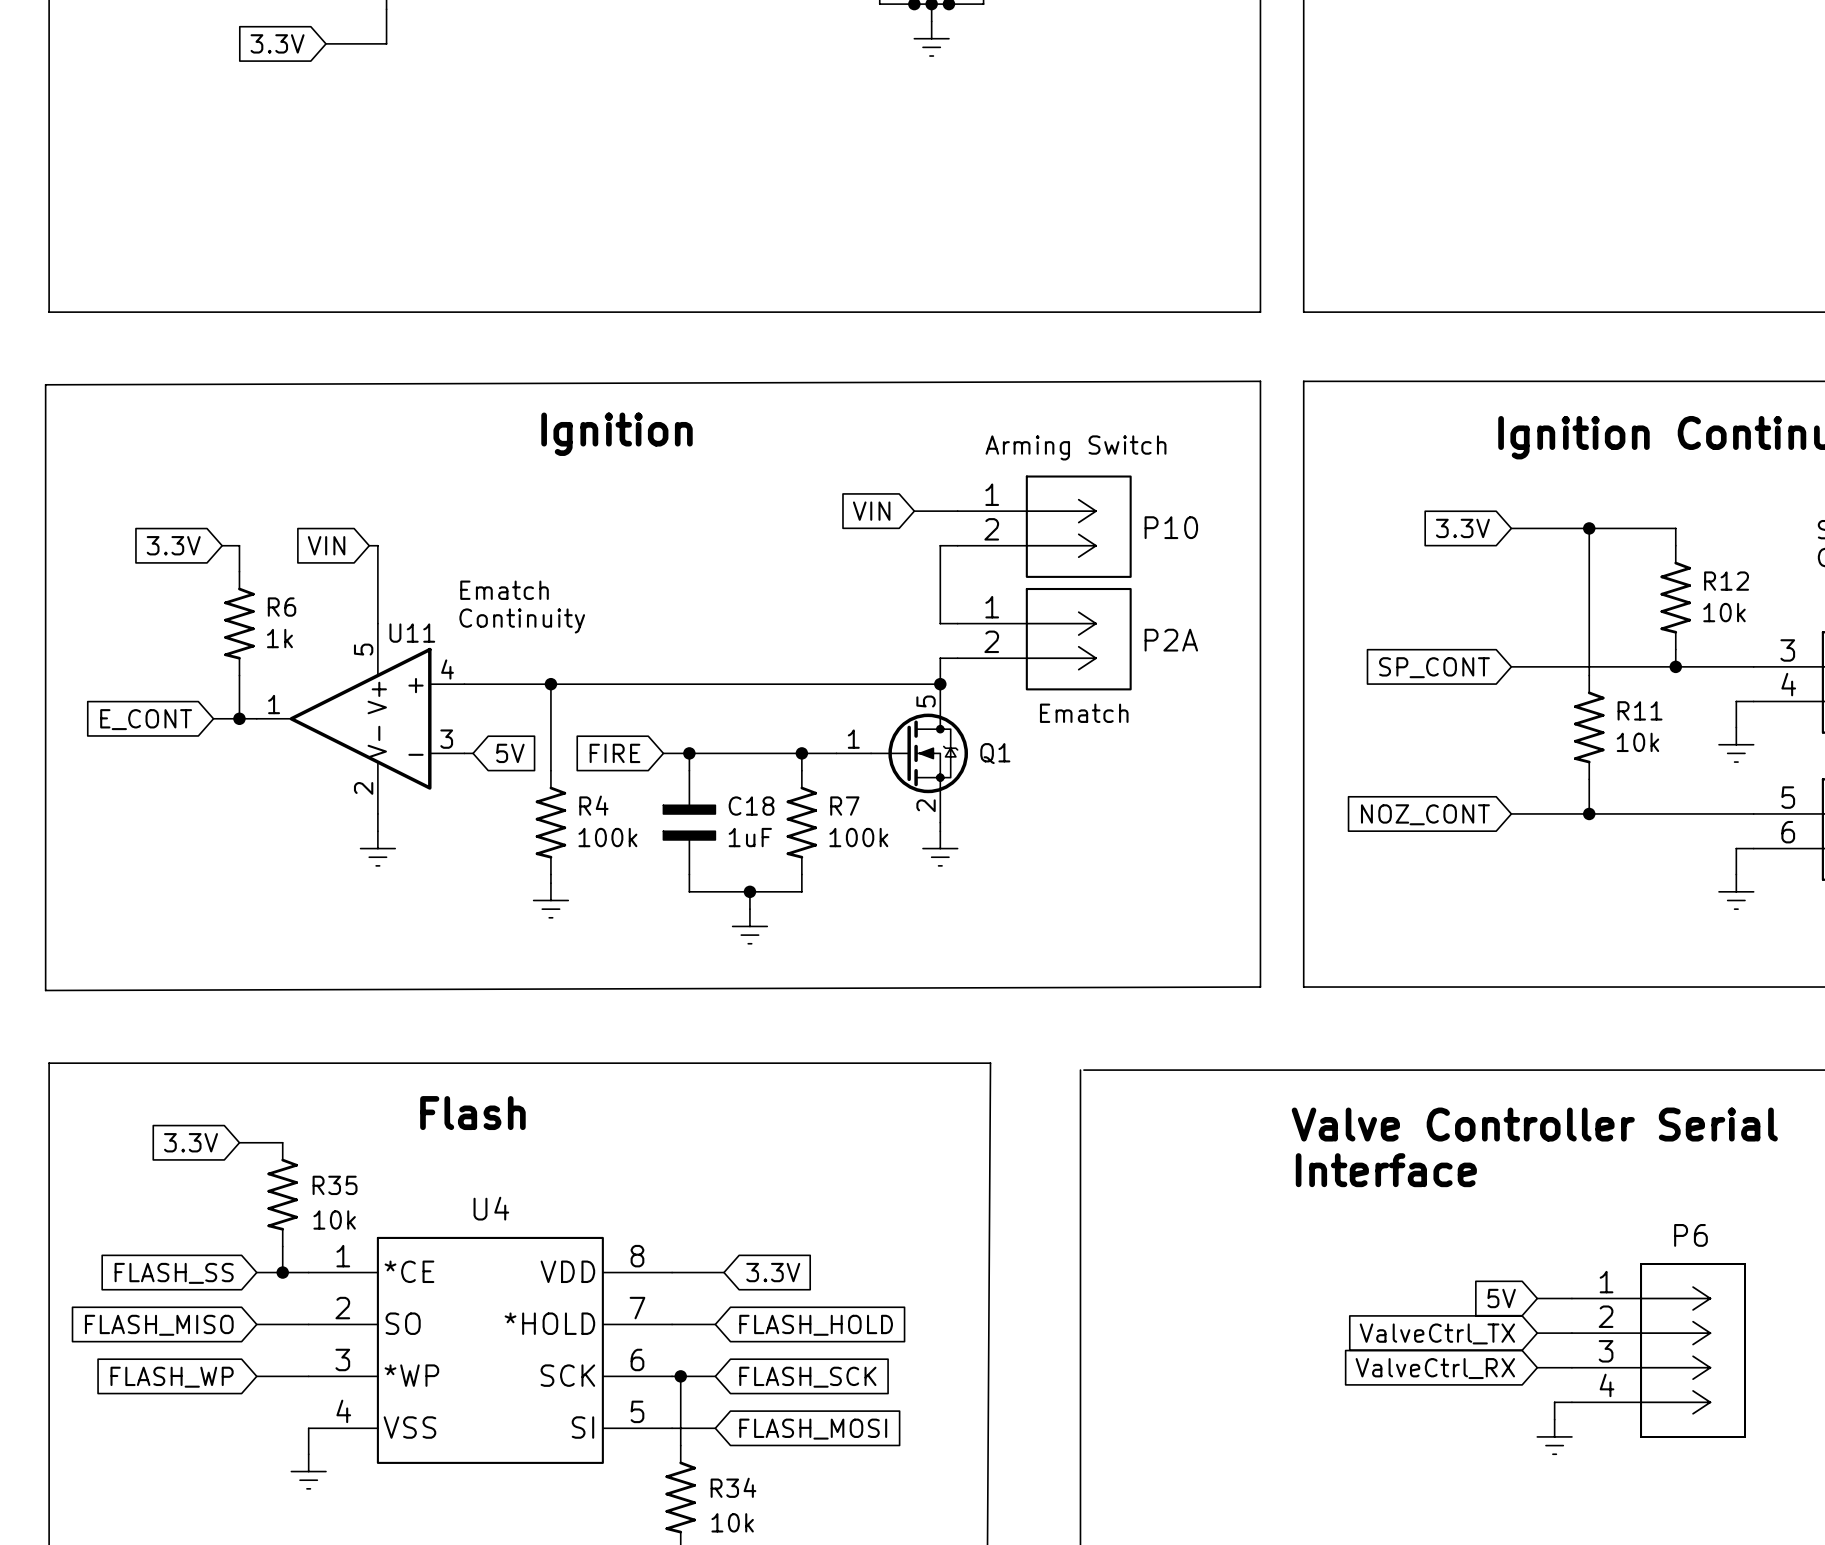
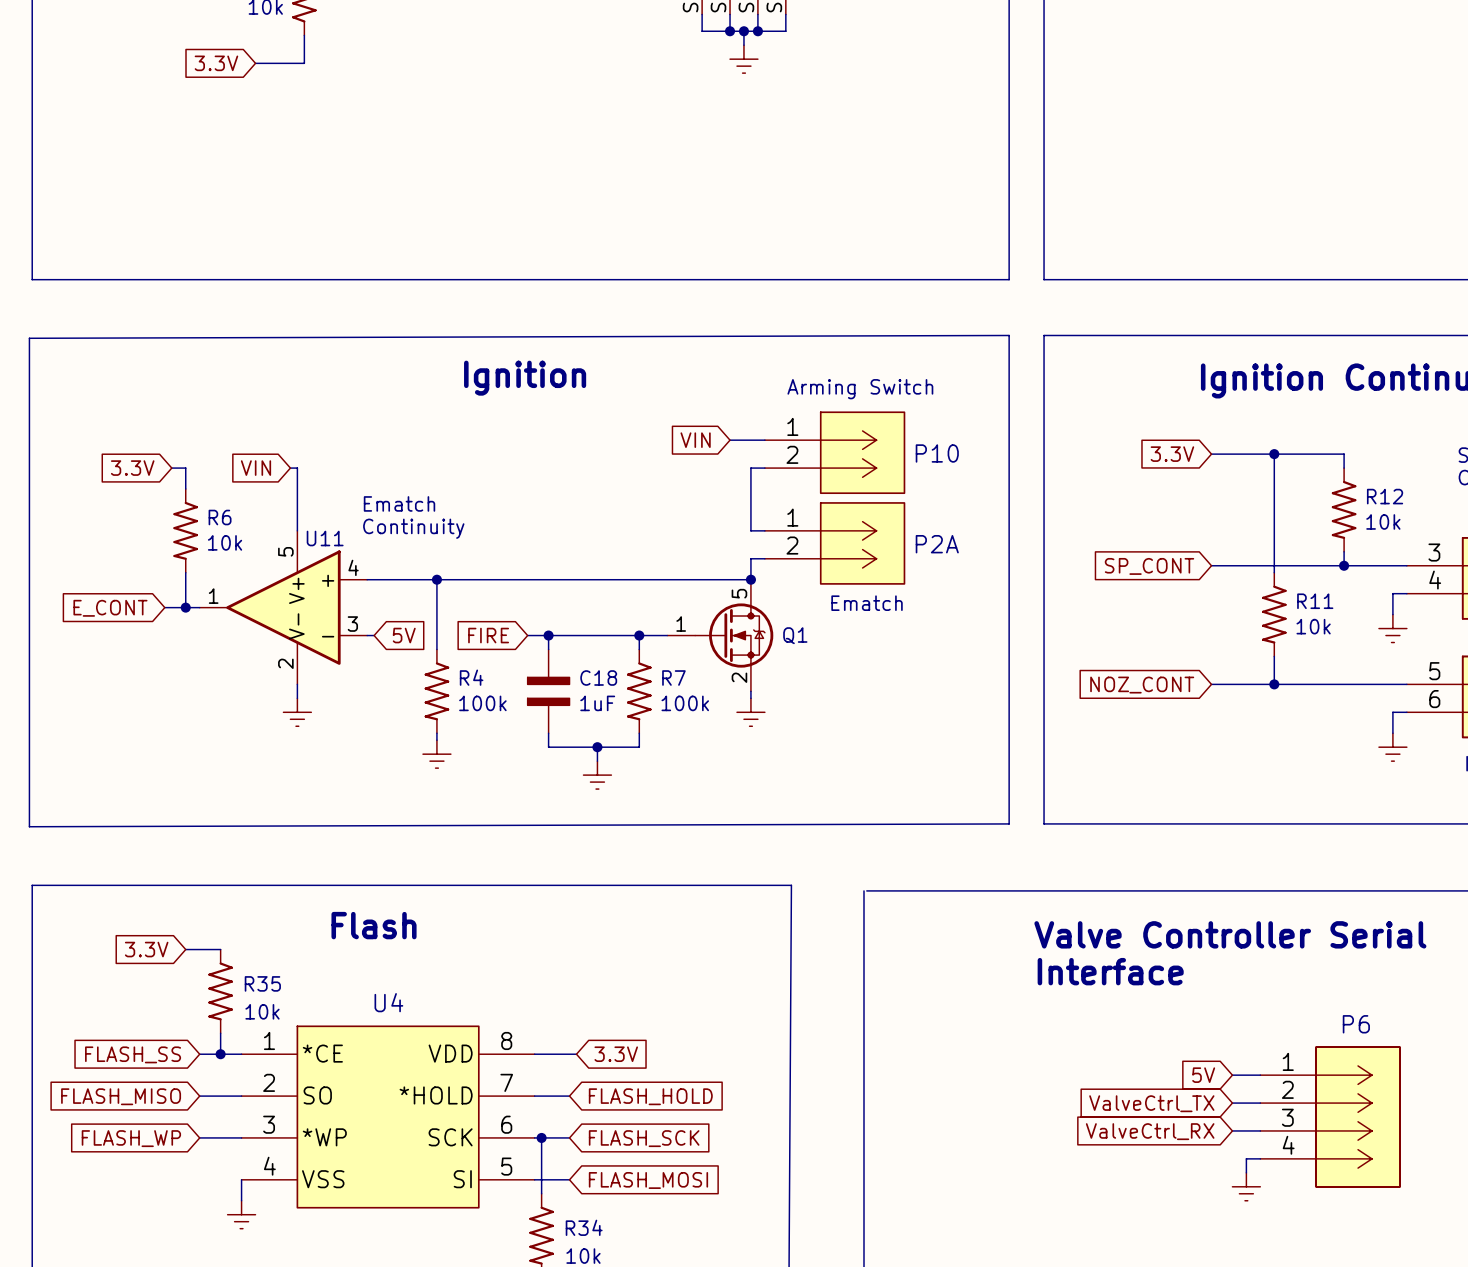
text position: Ignition (617, 434) -> Ignition (525, 378)
R6 value: 1k (279, 638) -> 10k (225, 542)

